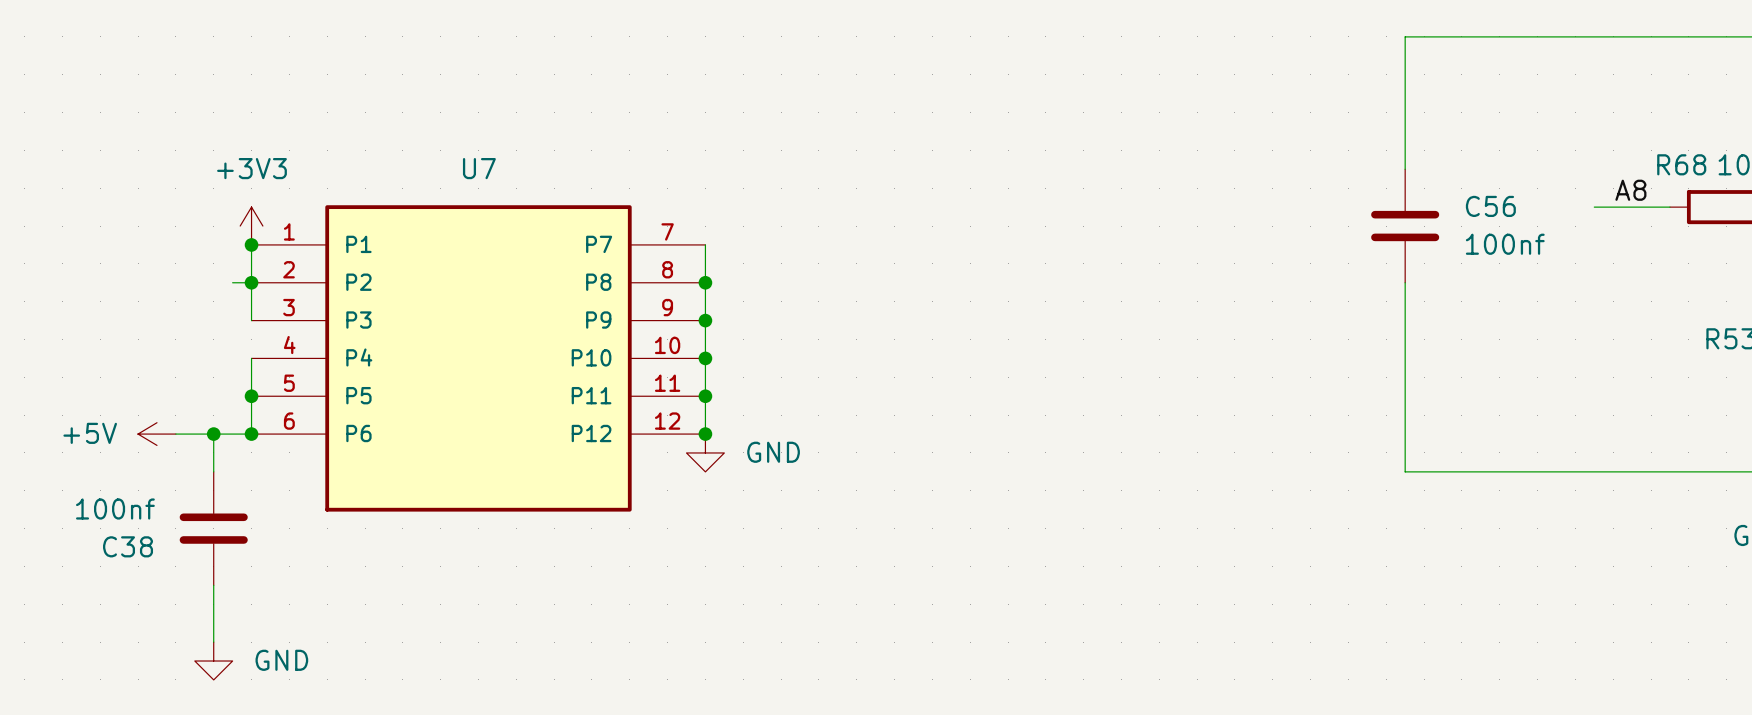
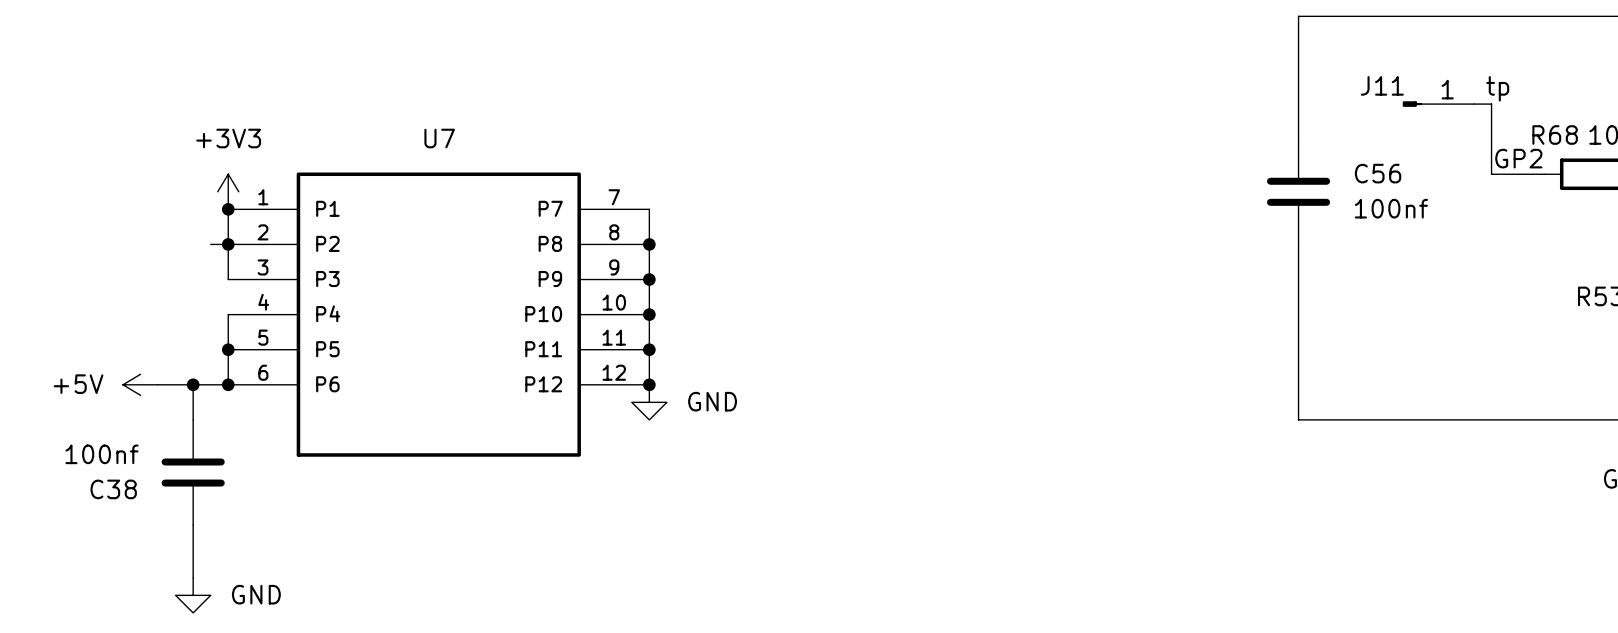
J11: none -> tp (1438, 104)
label: A8 (1630, 190) -> GP2 (1518, 158)
wire: (1594, 207) (1613, 207) -> (1474, 104) (1491, 104) (1491, 174)

